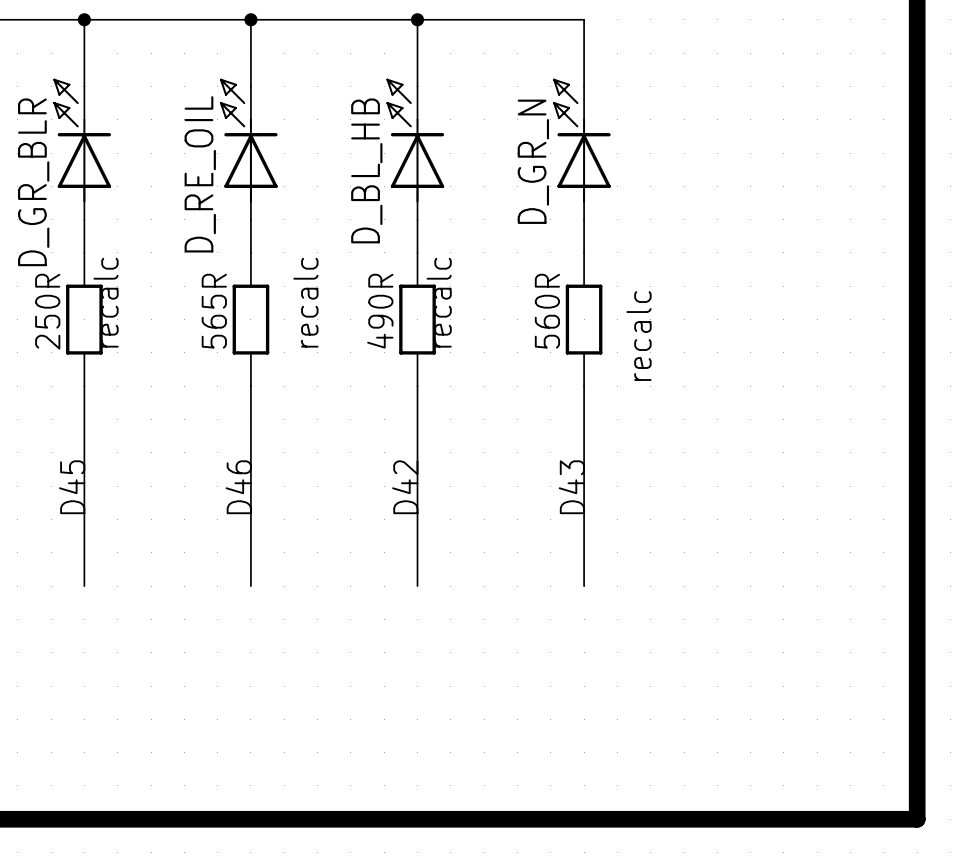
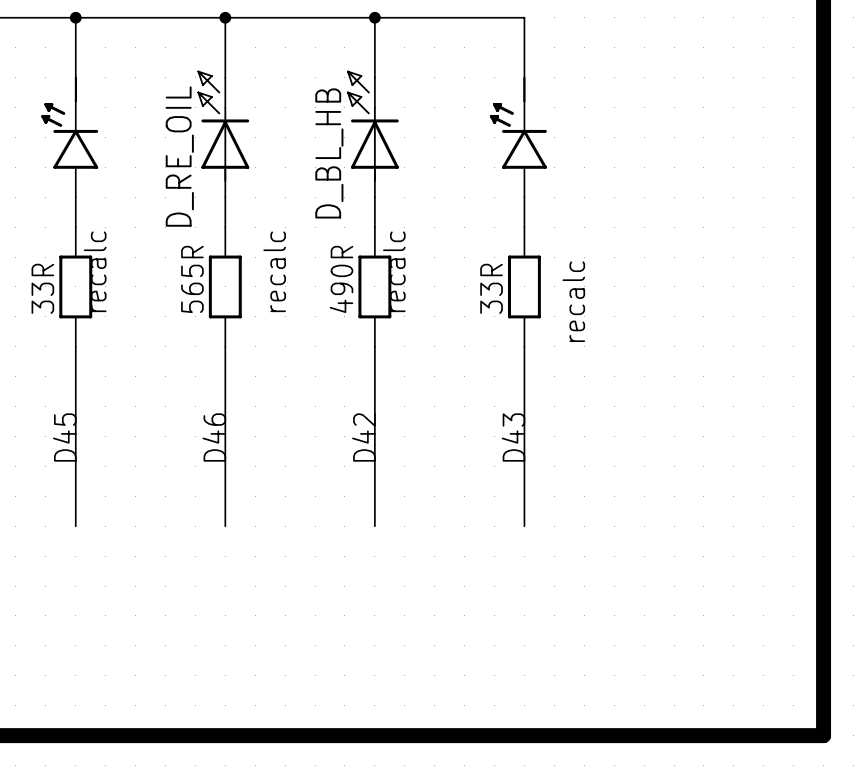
D_GR_BLR: (82, 149) -> none
D_GR_N: (581, 149) -> none
part: none -> (69, 149)
part: none -> (518, 149)
part value: 250R (47, 311) -> 33R (42, 288)
part value: 560R (547, 311) -> 33R (491, 288)

